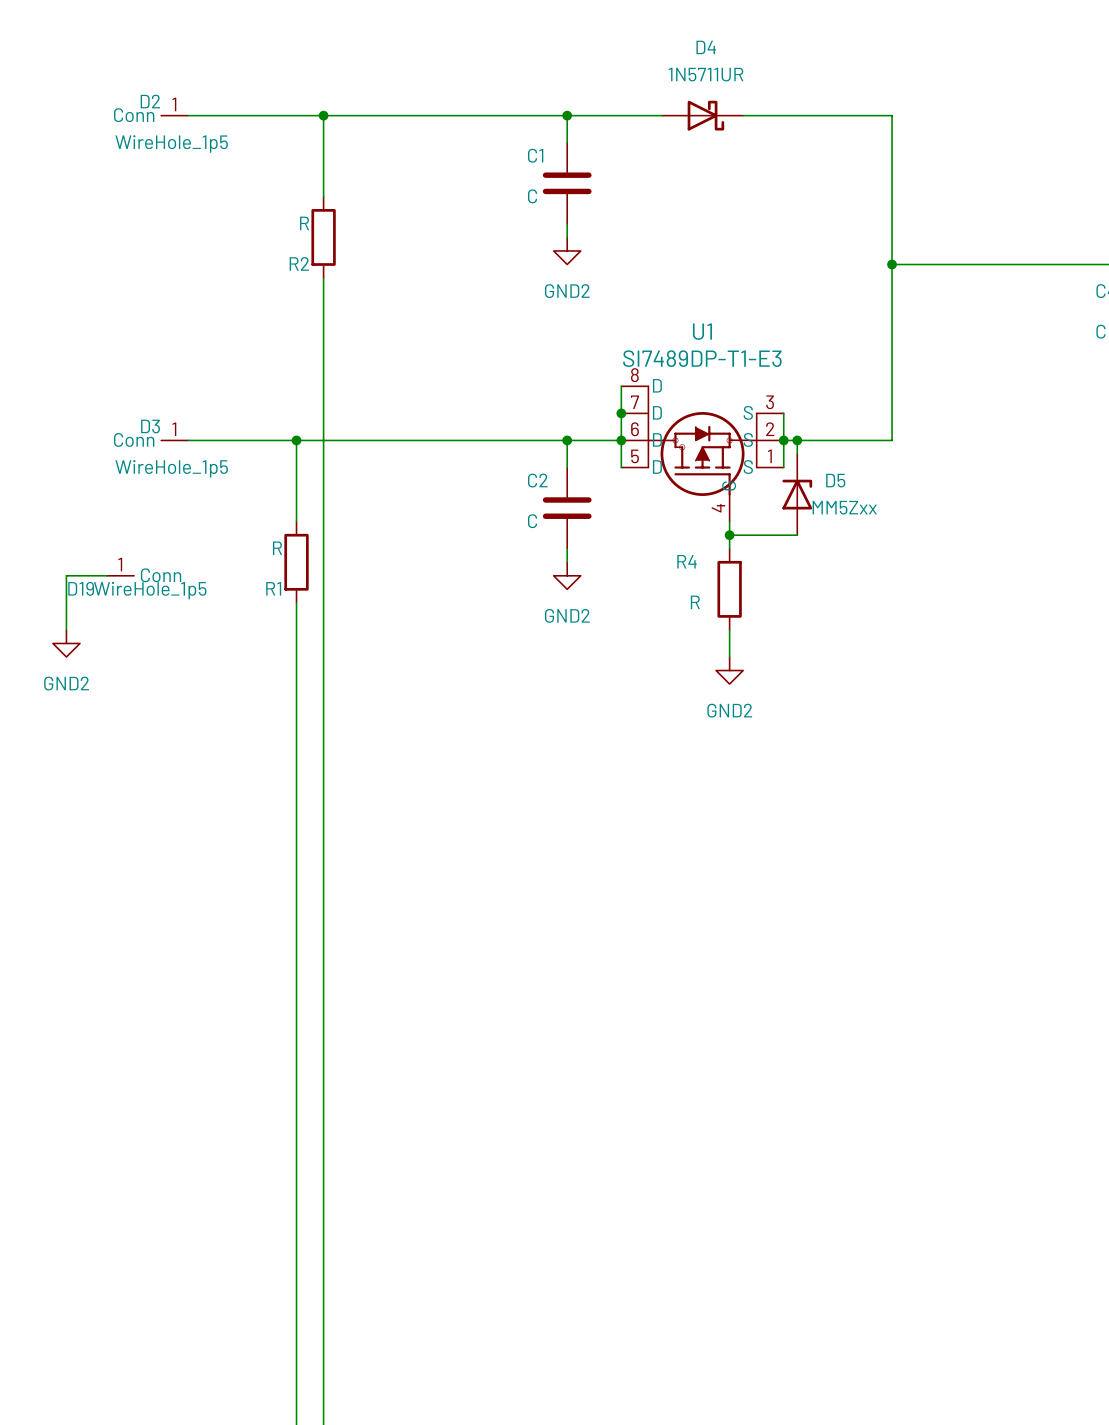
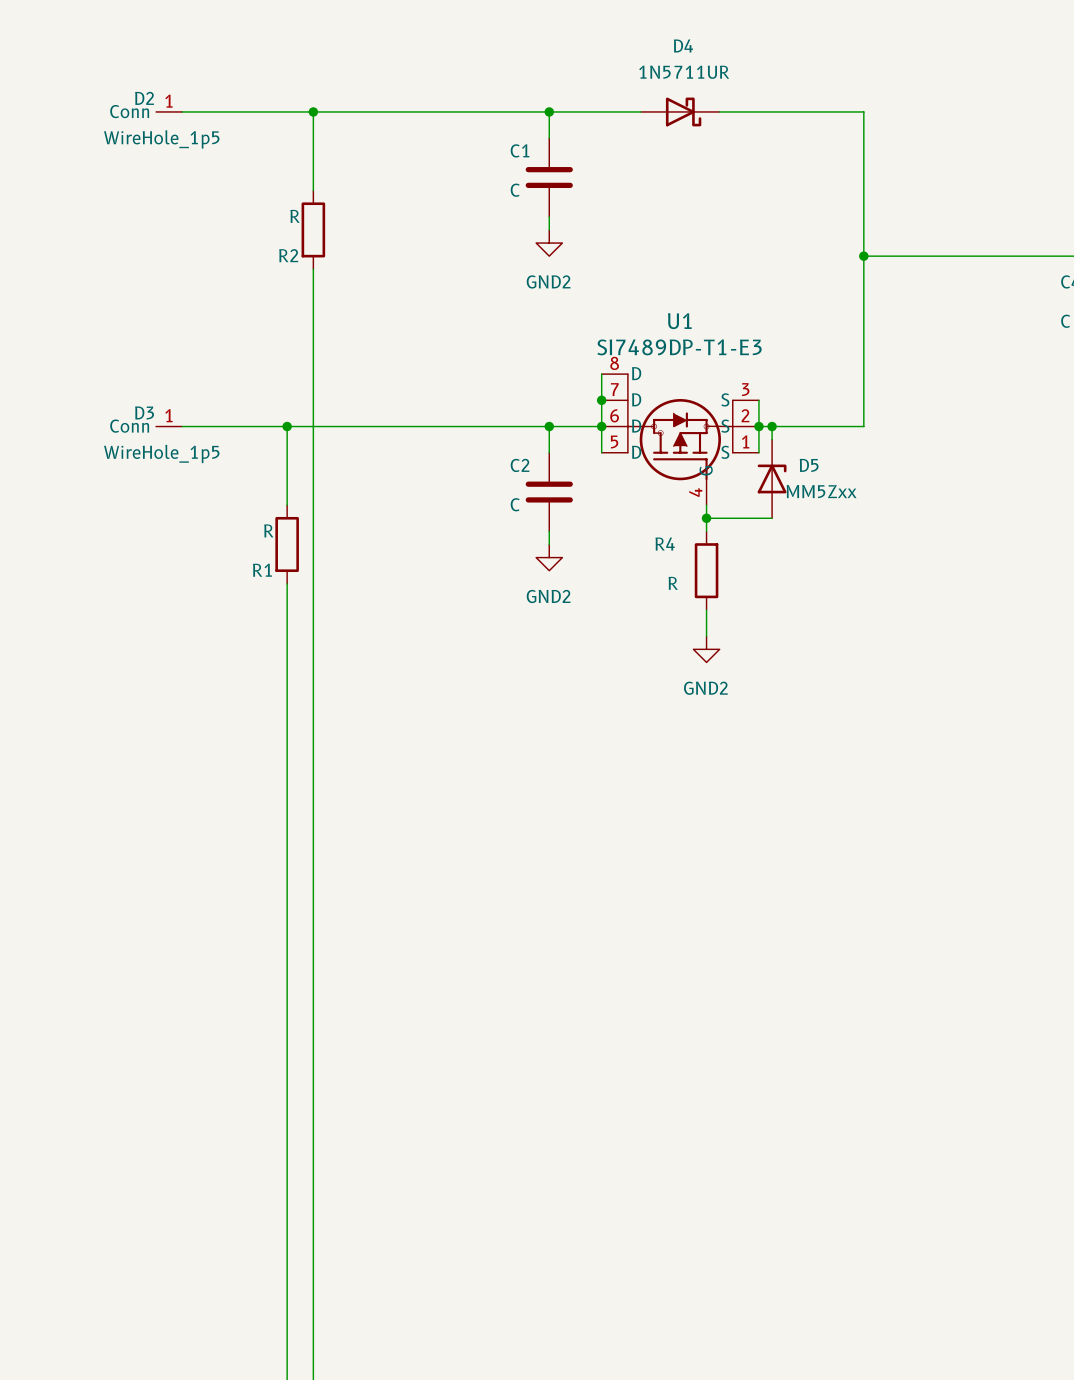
wire: (107, 575) (66, 575) (66, 629) -> none
D19: WireHole_1p5 (120, 575) -> none
power symbol: GND2 (66, 643) -> none

